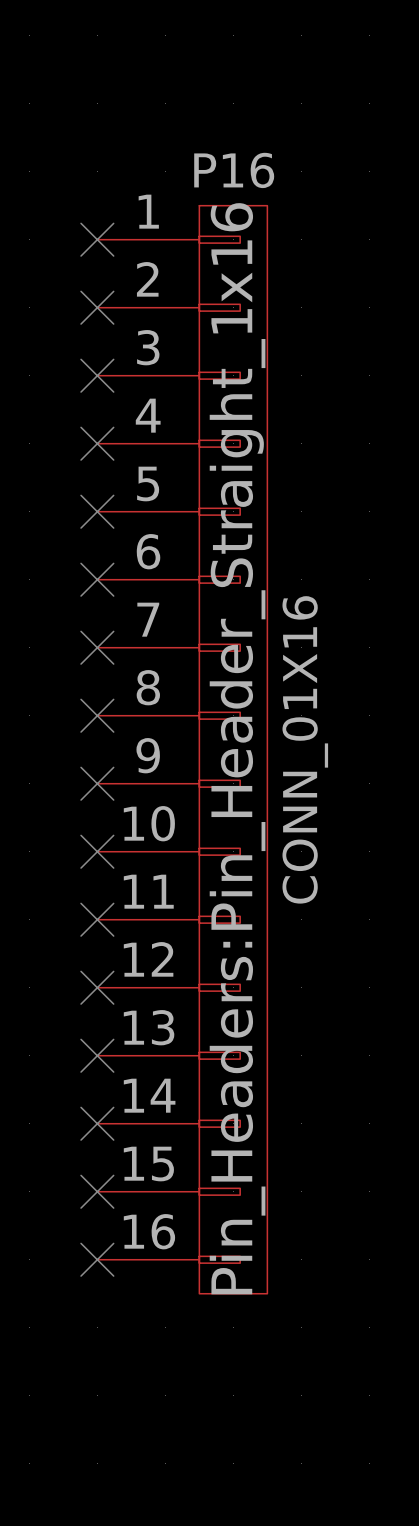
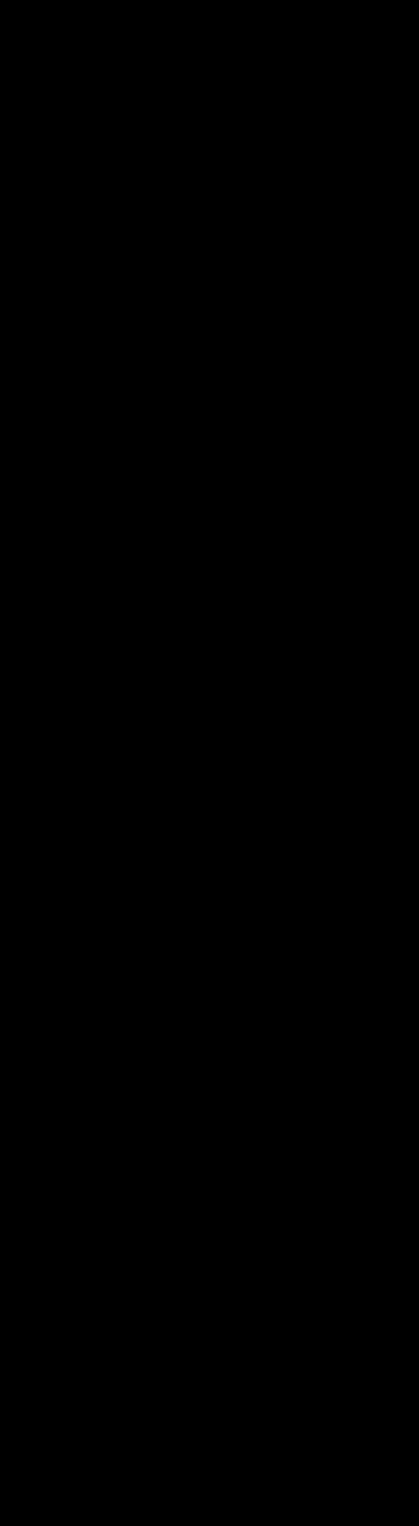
no-connect mark: (97, 239) -> none
no-connect mark: (97, 307) -> none
no-connect mark: (97, 375) -> none
no-connect mark: (97, 443) -> none
no-connect mark: (97, 511) -> none
no-connect mark: (97, 579) -> none
no-connect mark: (97, 647) -> none
no-connect mark: (97, 715) -> none
P16: CONN_01X16 (182, 749) -> none
no-connect mark: (97, 783) -> none
no-connect mark: (97, 851) -> none
no-connect mark: (97, 919) -> none
no-connect mark: (97, 987) -> none
no-connect mark: (97, 1055) -> none
no-connect mark: (97, 1123) -> none
no-connect mark: (97, 1191) -> none
no-connect mark: (97, 1259) -> none

